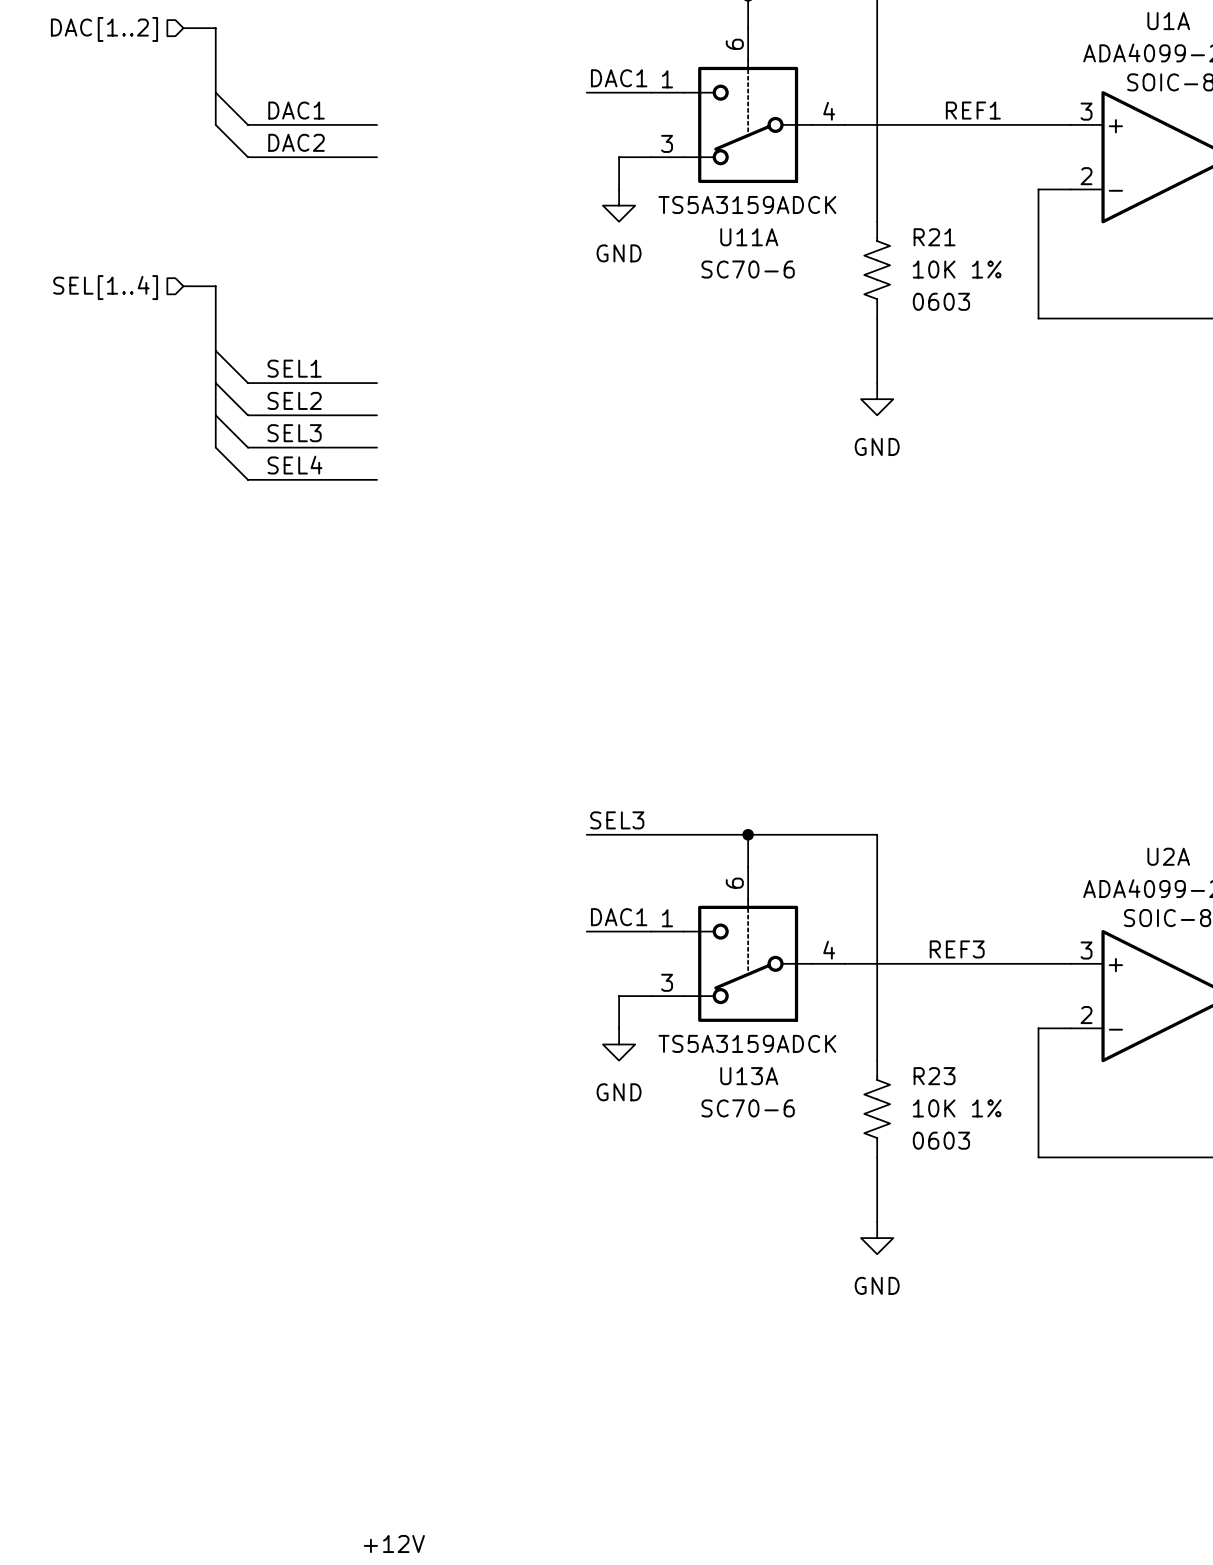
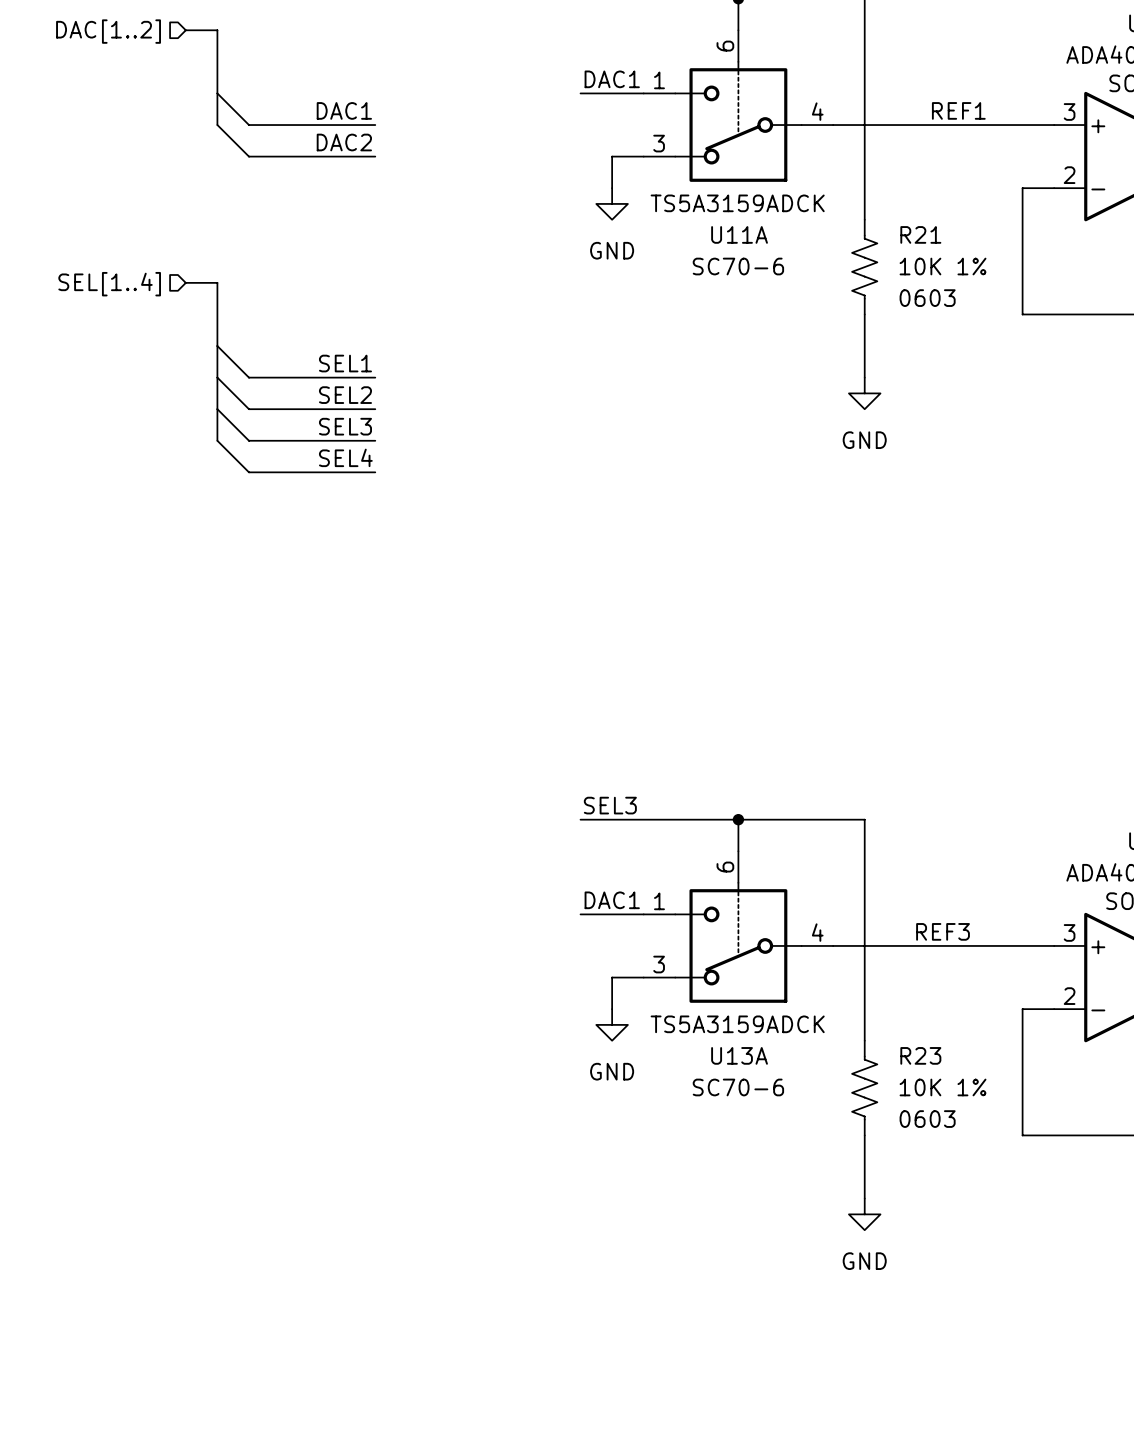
label position: DAC1 (296, 110) -> DAC1 (344, 110)
label position: DAC2 (296, 142) -> DAC2 (344, 142)
label position: SEL1 (294, 368) -> SEL1 (345, 363)
label position: SEL2 (294, 400) -> SEL2 (345, 395)
label position: SEL3 (294, 433) -> SEL3 (345, 426)
label position: SEL4 (294, 465) -> SEL4 (345, 457)

